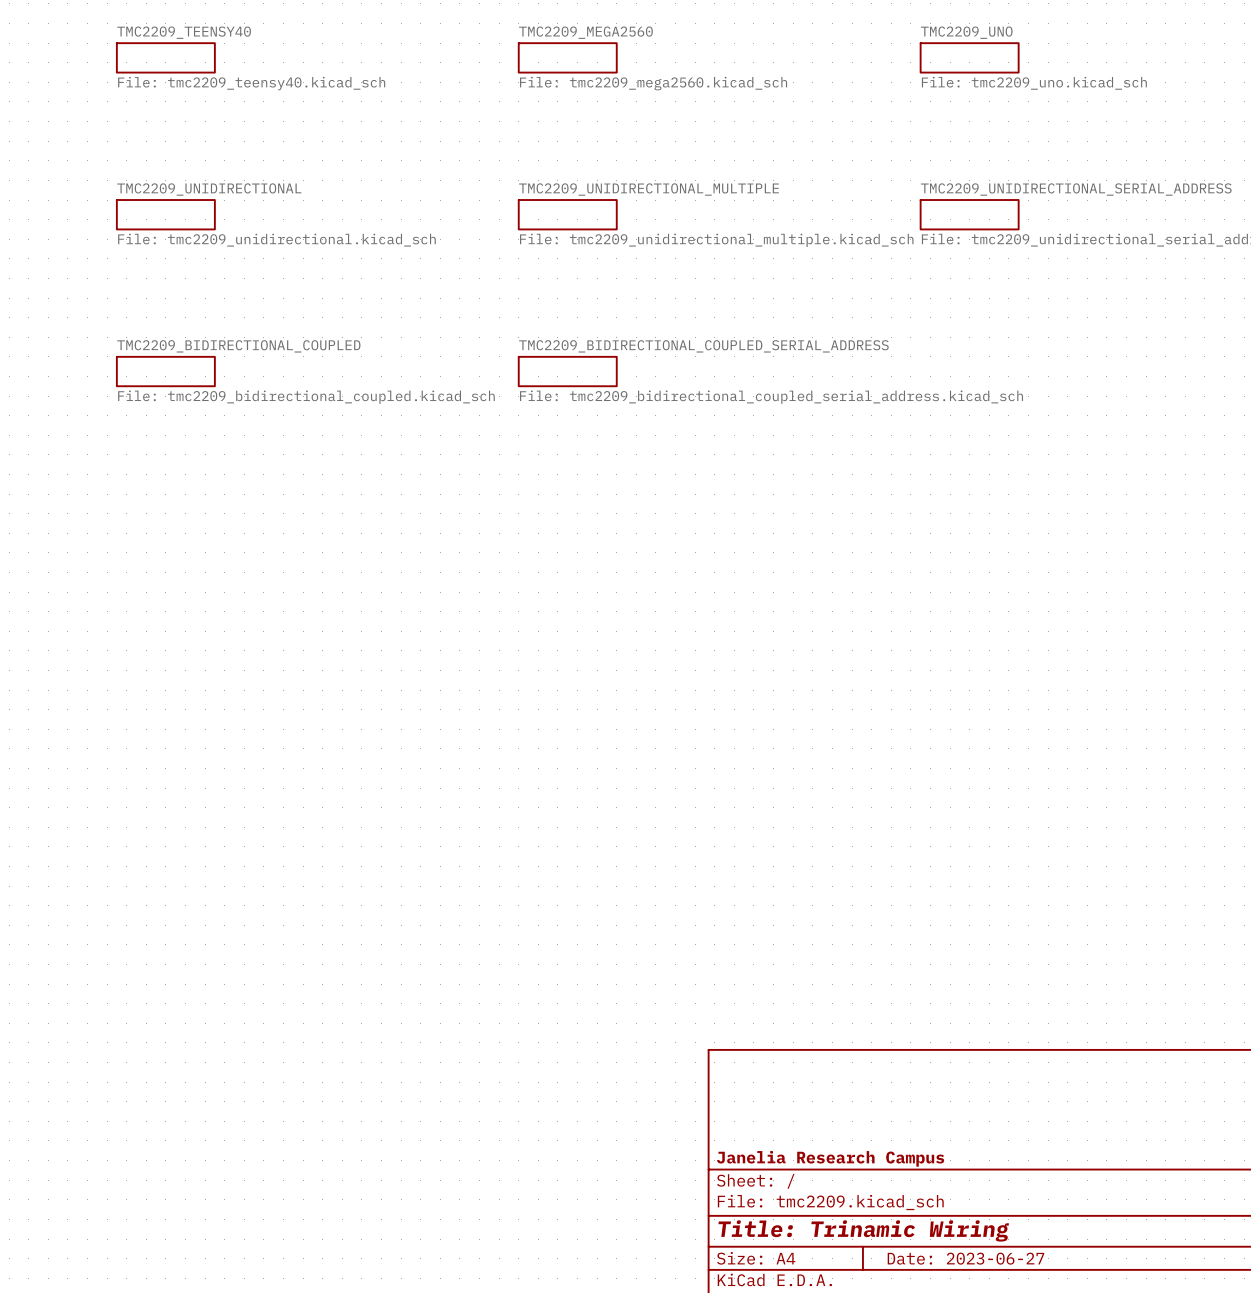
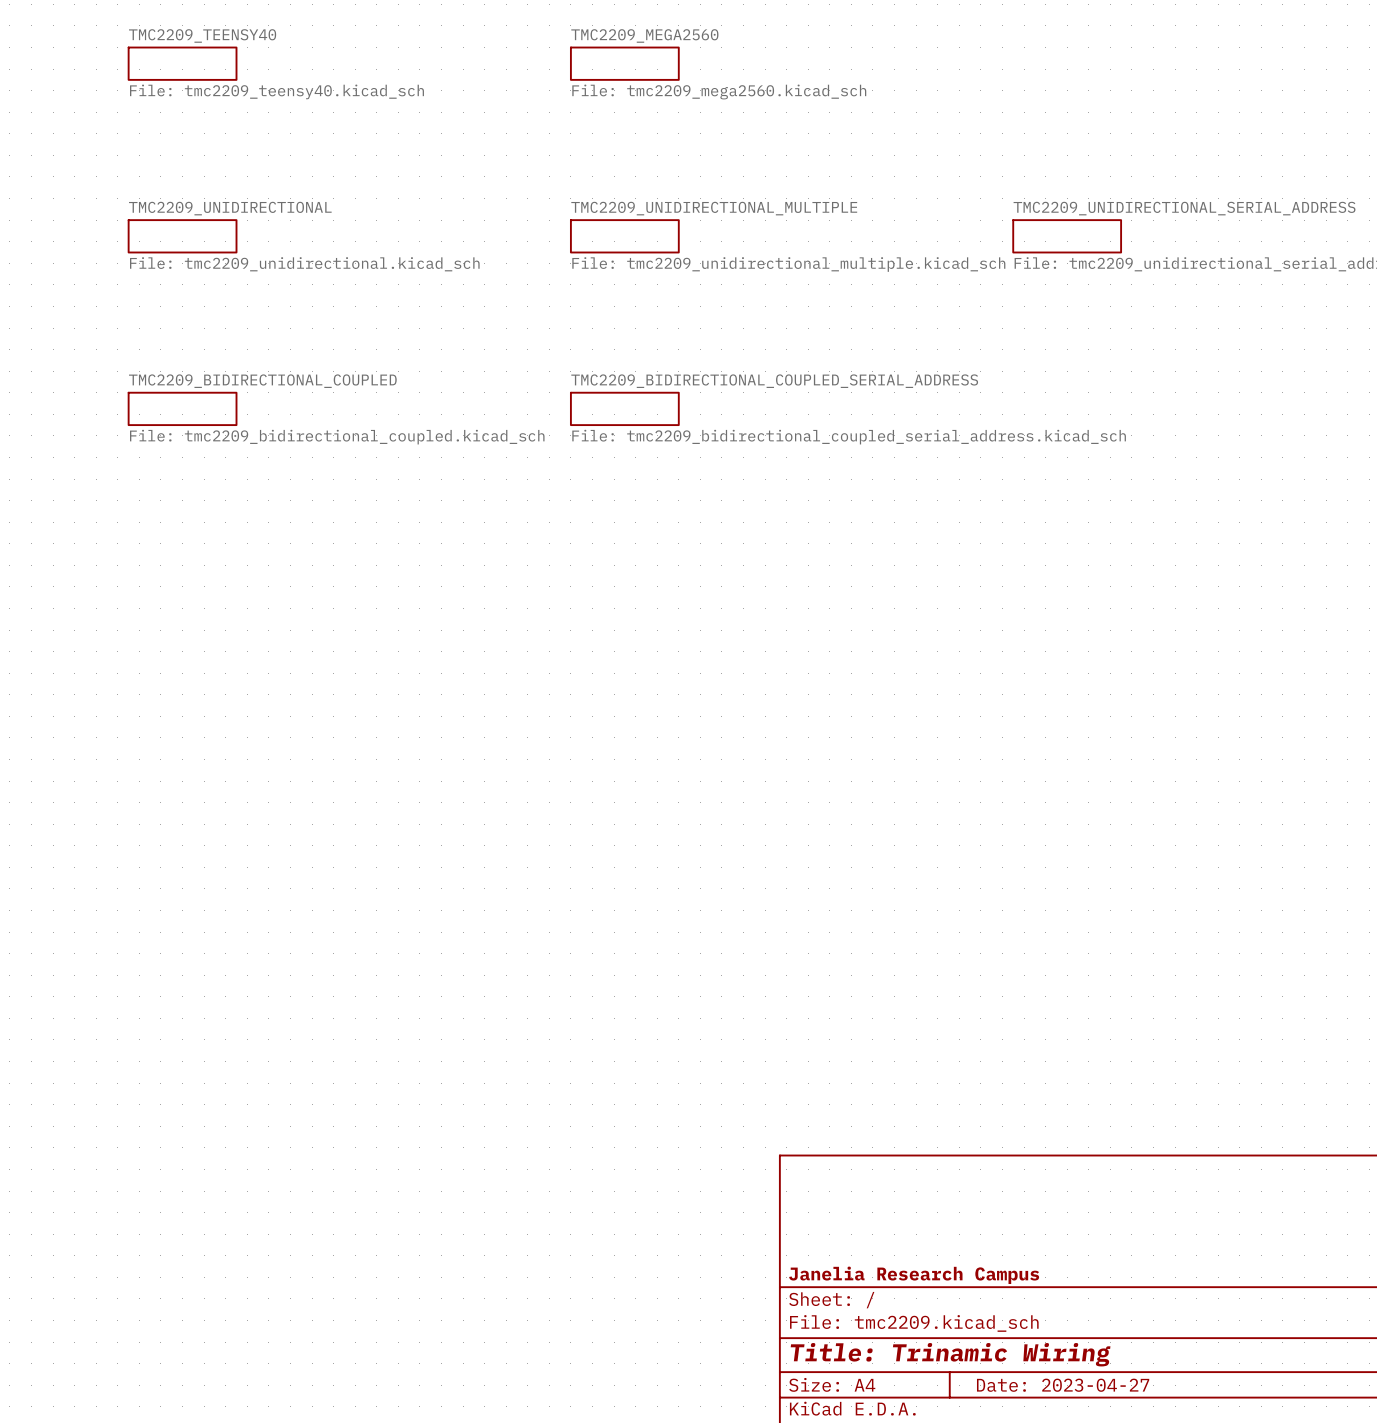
sheet TMC2209_UNO: File: tmc2209_uno.kicad_sch (969, 57) -> none
title block: Date: 2023-06-27 (965, 1258) -> Date: 2023-04-27 (1063, 1385)

